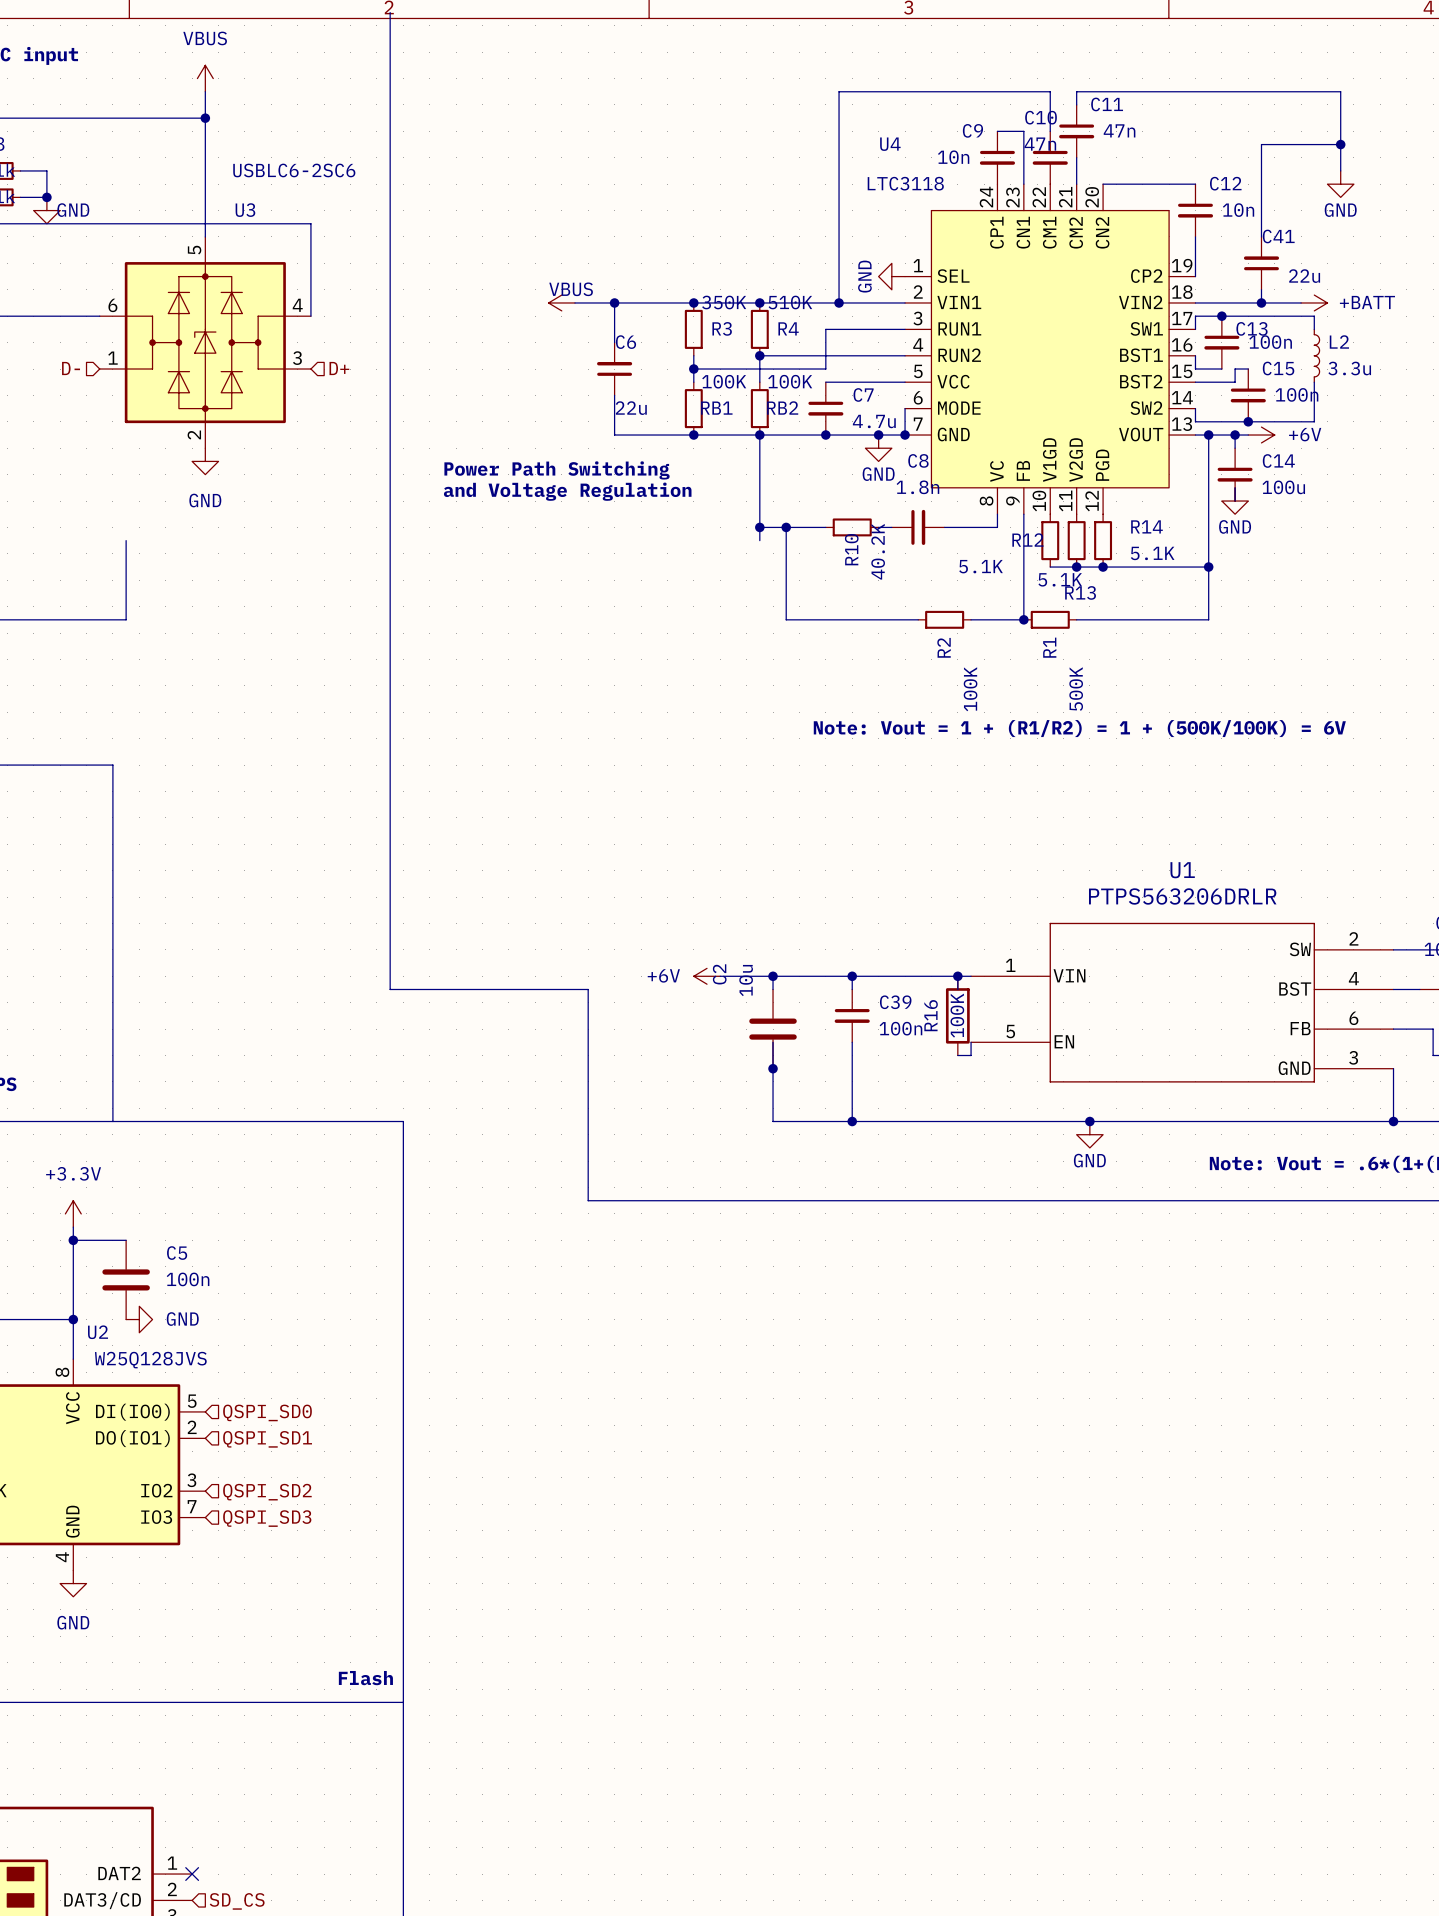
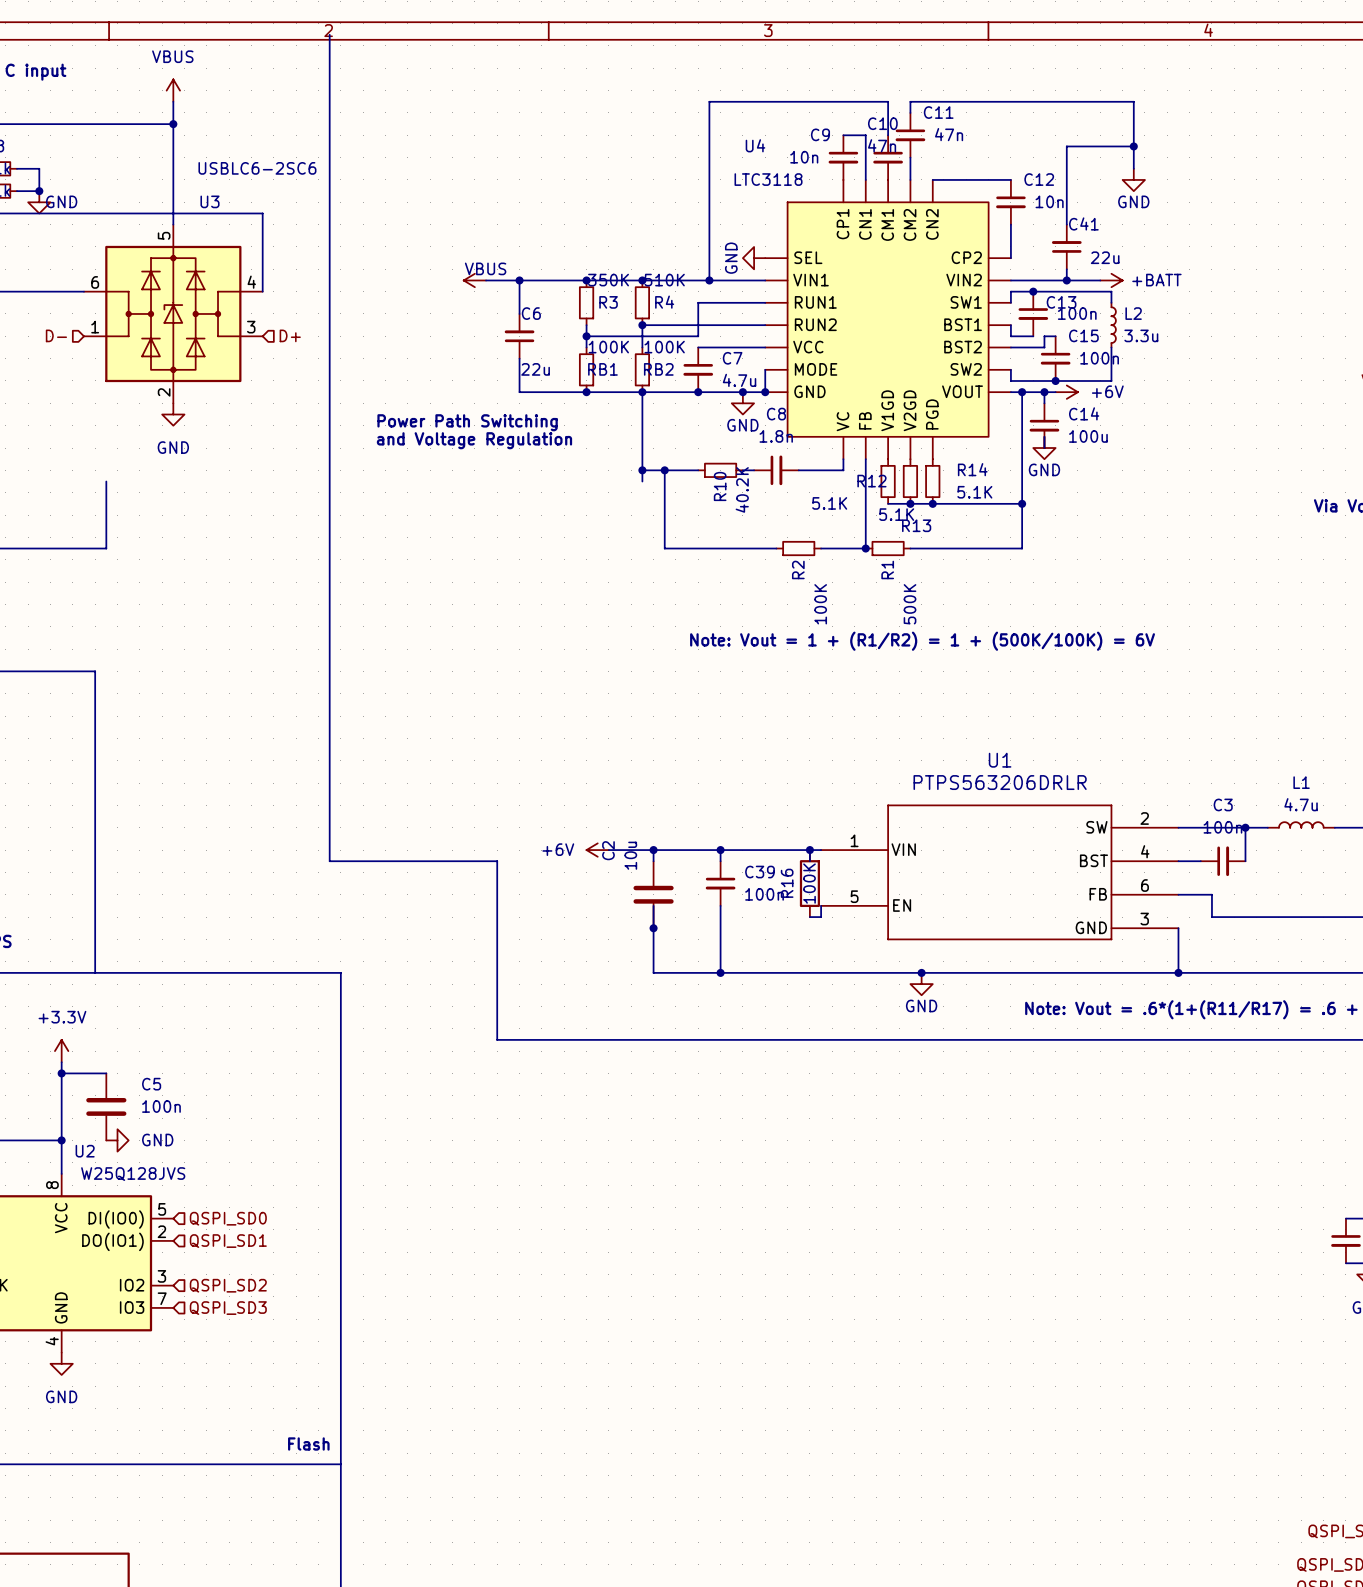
U4 symbol: [905, 184, 1196, 515] -> [765, 179, 1011, 460]

